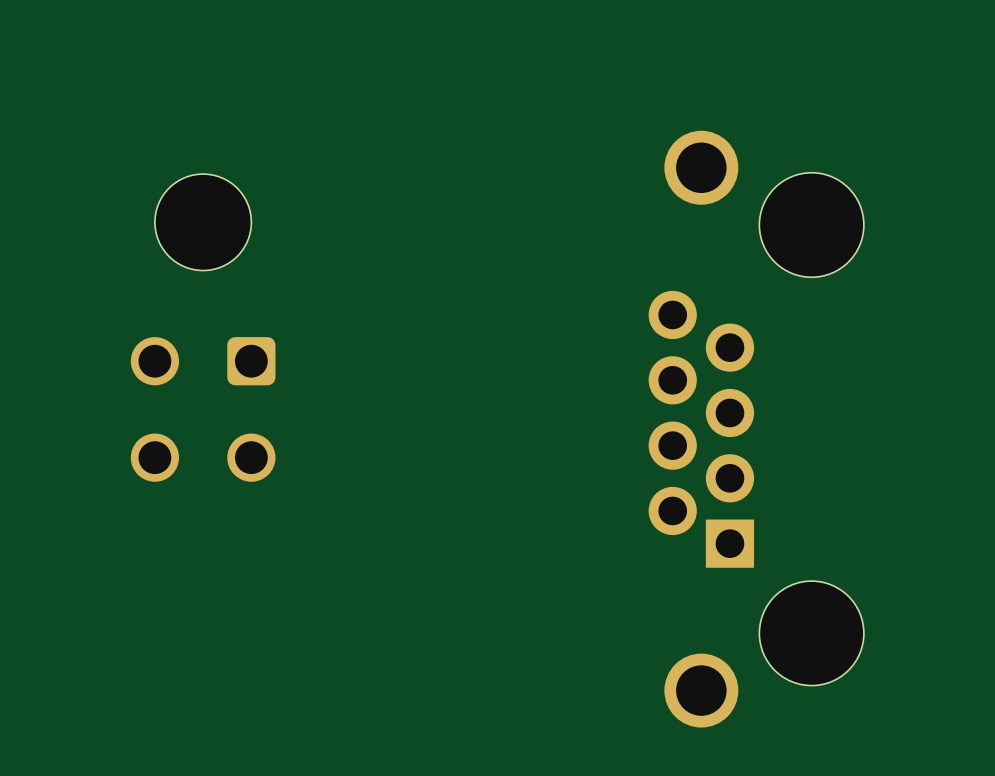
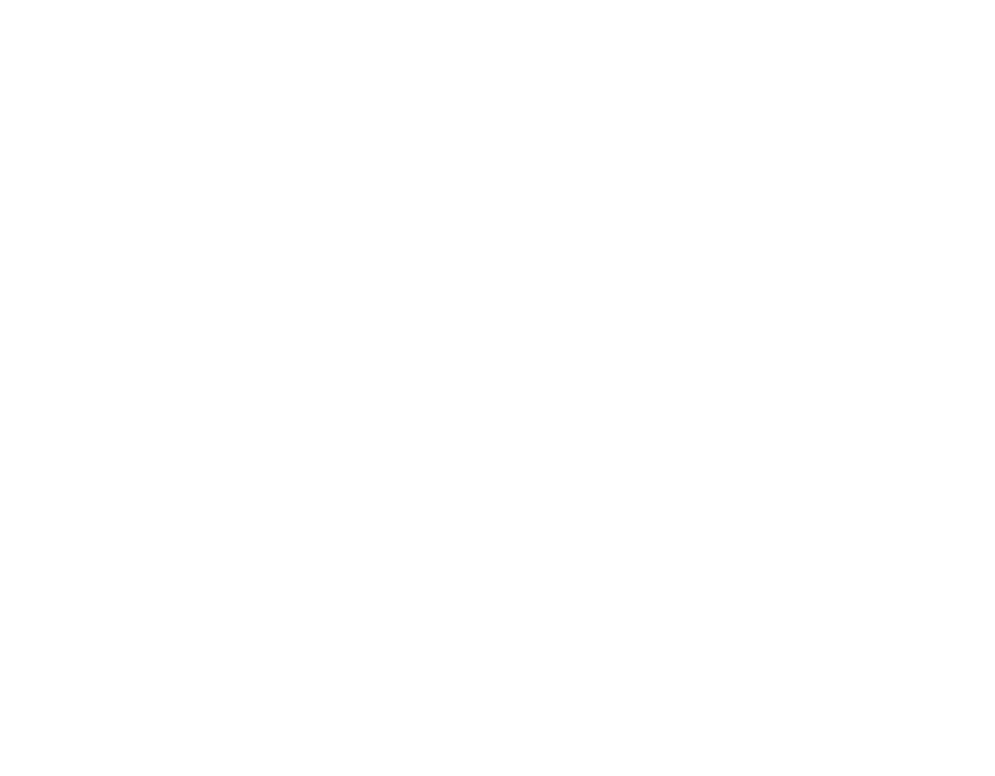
part: (203, 327) -> none
part: (756, 429) -> none

